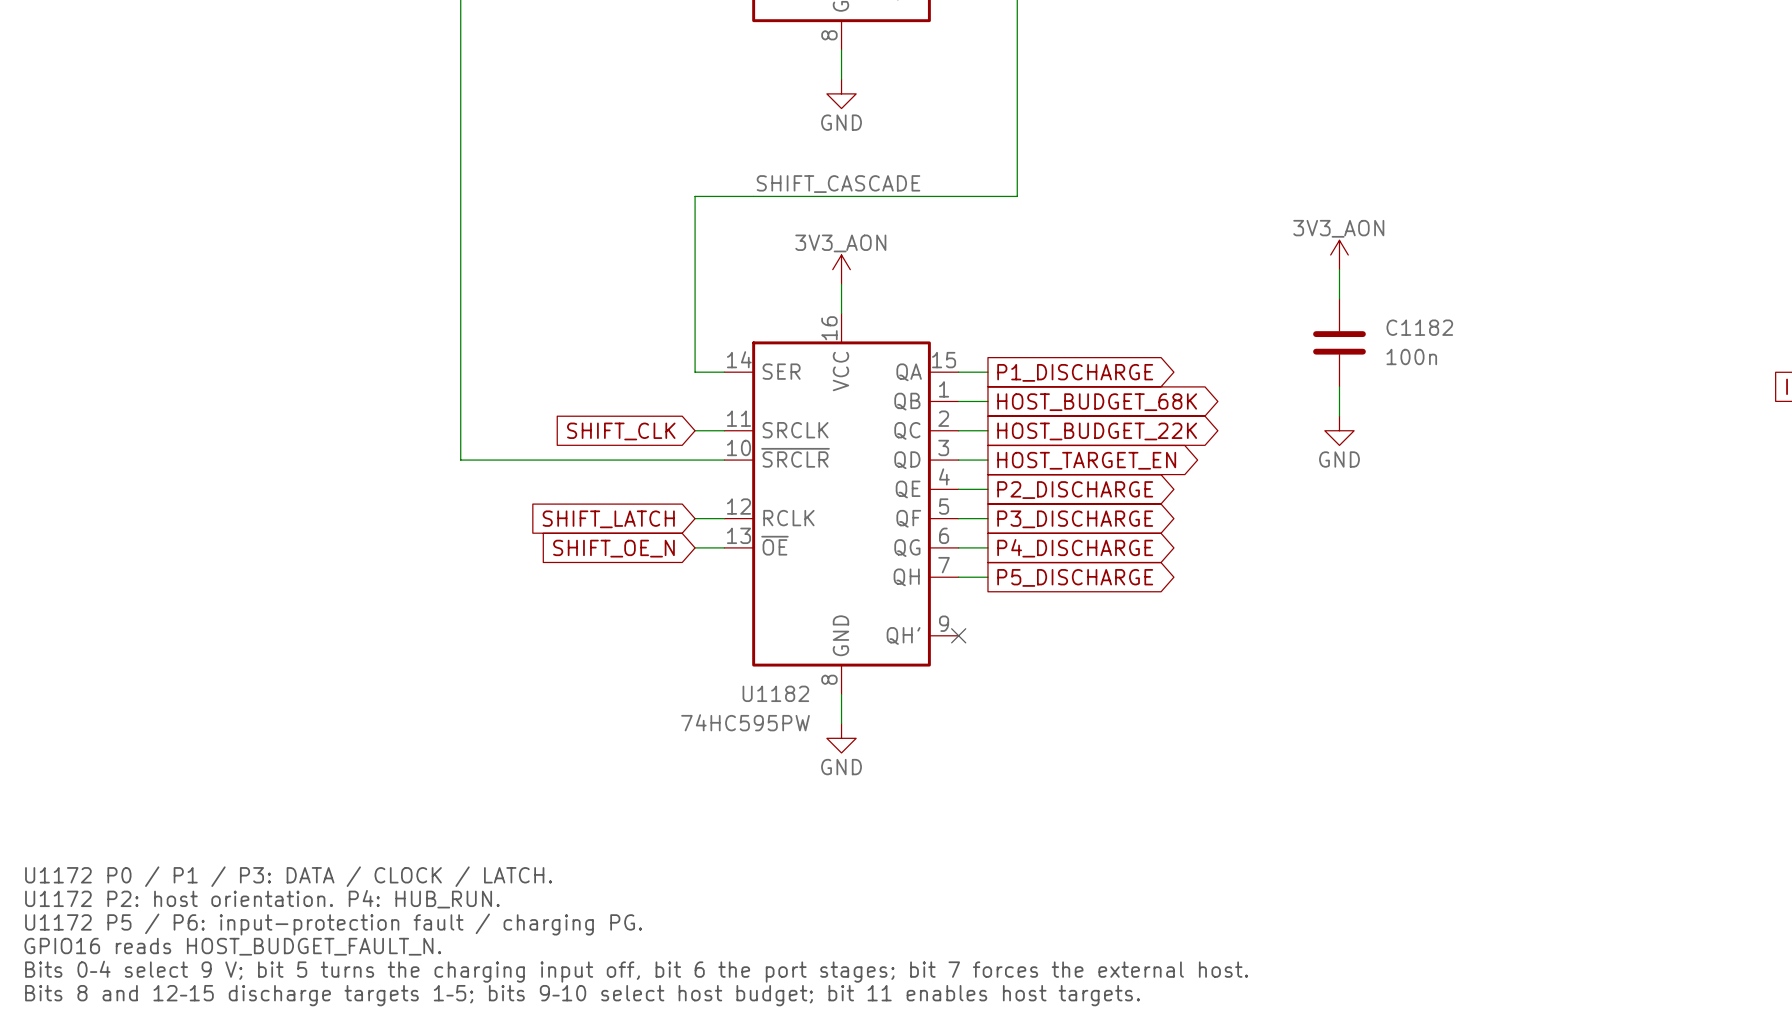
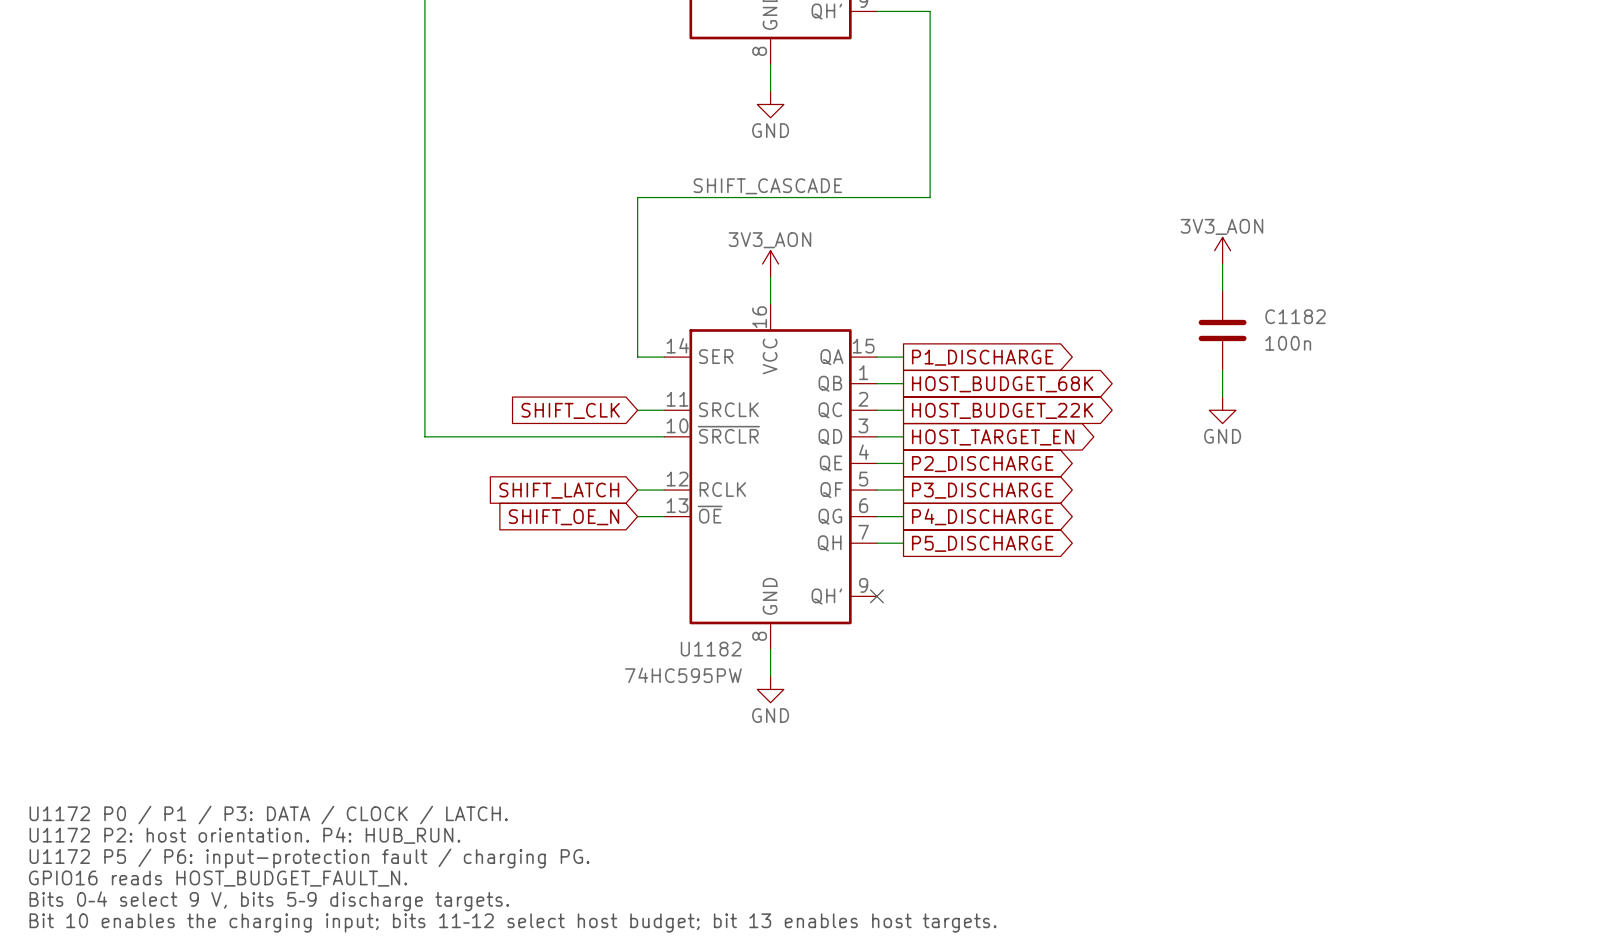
text: Bits 0–4 select 9 V; bit 5 turns the charging input off, bit 6 the port stages; bit 7 forces the external host. (636, 971) -> Bits 0–4 select 9 V, bits 5–9 discharge targets. (269, 901)
text: Bits 8 and 12–15 discharge targets 1–5; bits 9–10 select host budget; bit 11 enables host targets. (582, 995) -> Bit 10 enables the charging input; bits 11–12 select host budget; bit 13 enables host targets. (513, 922)

